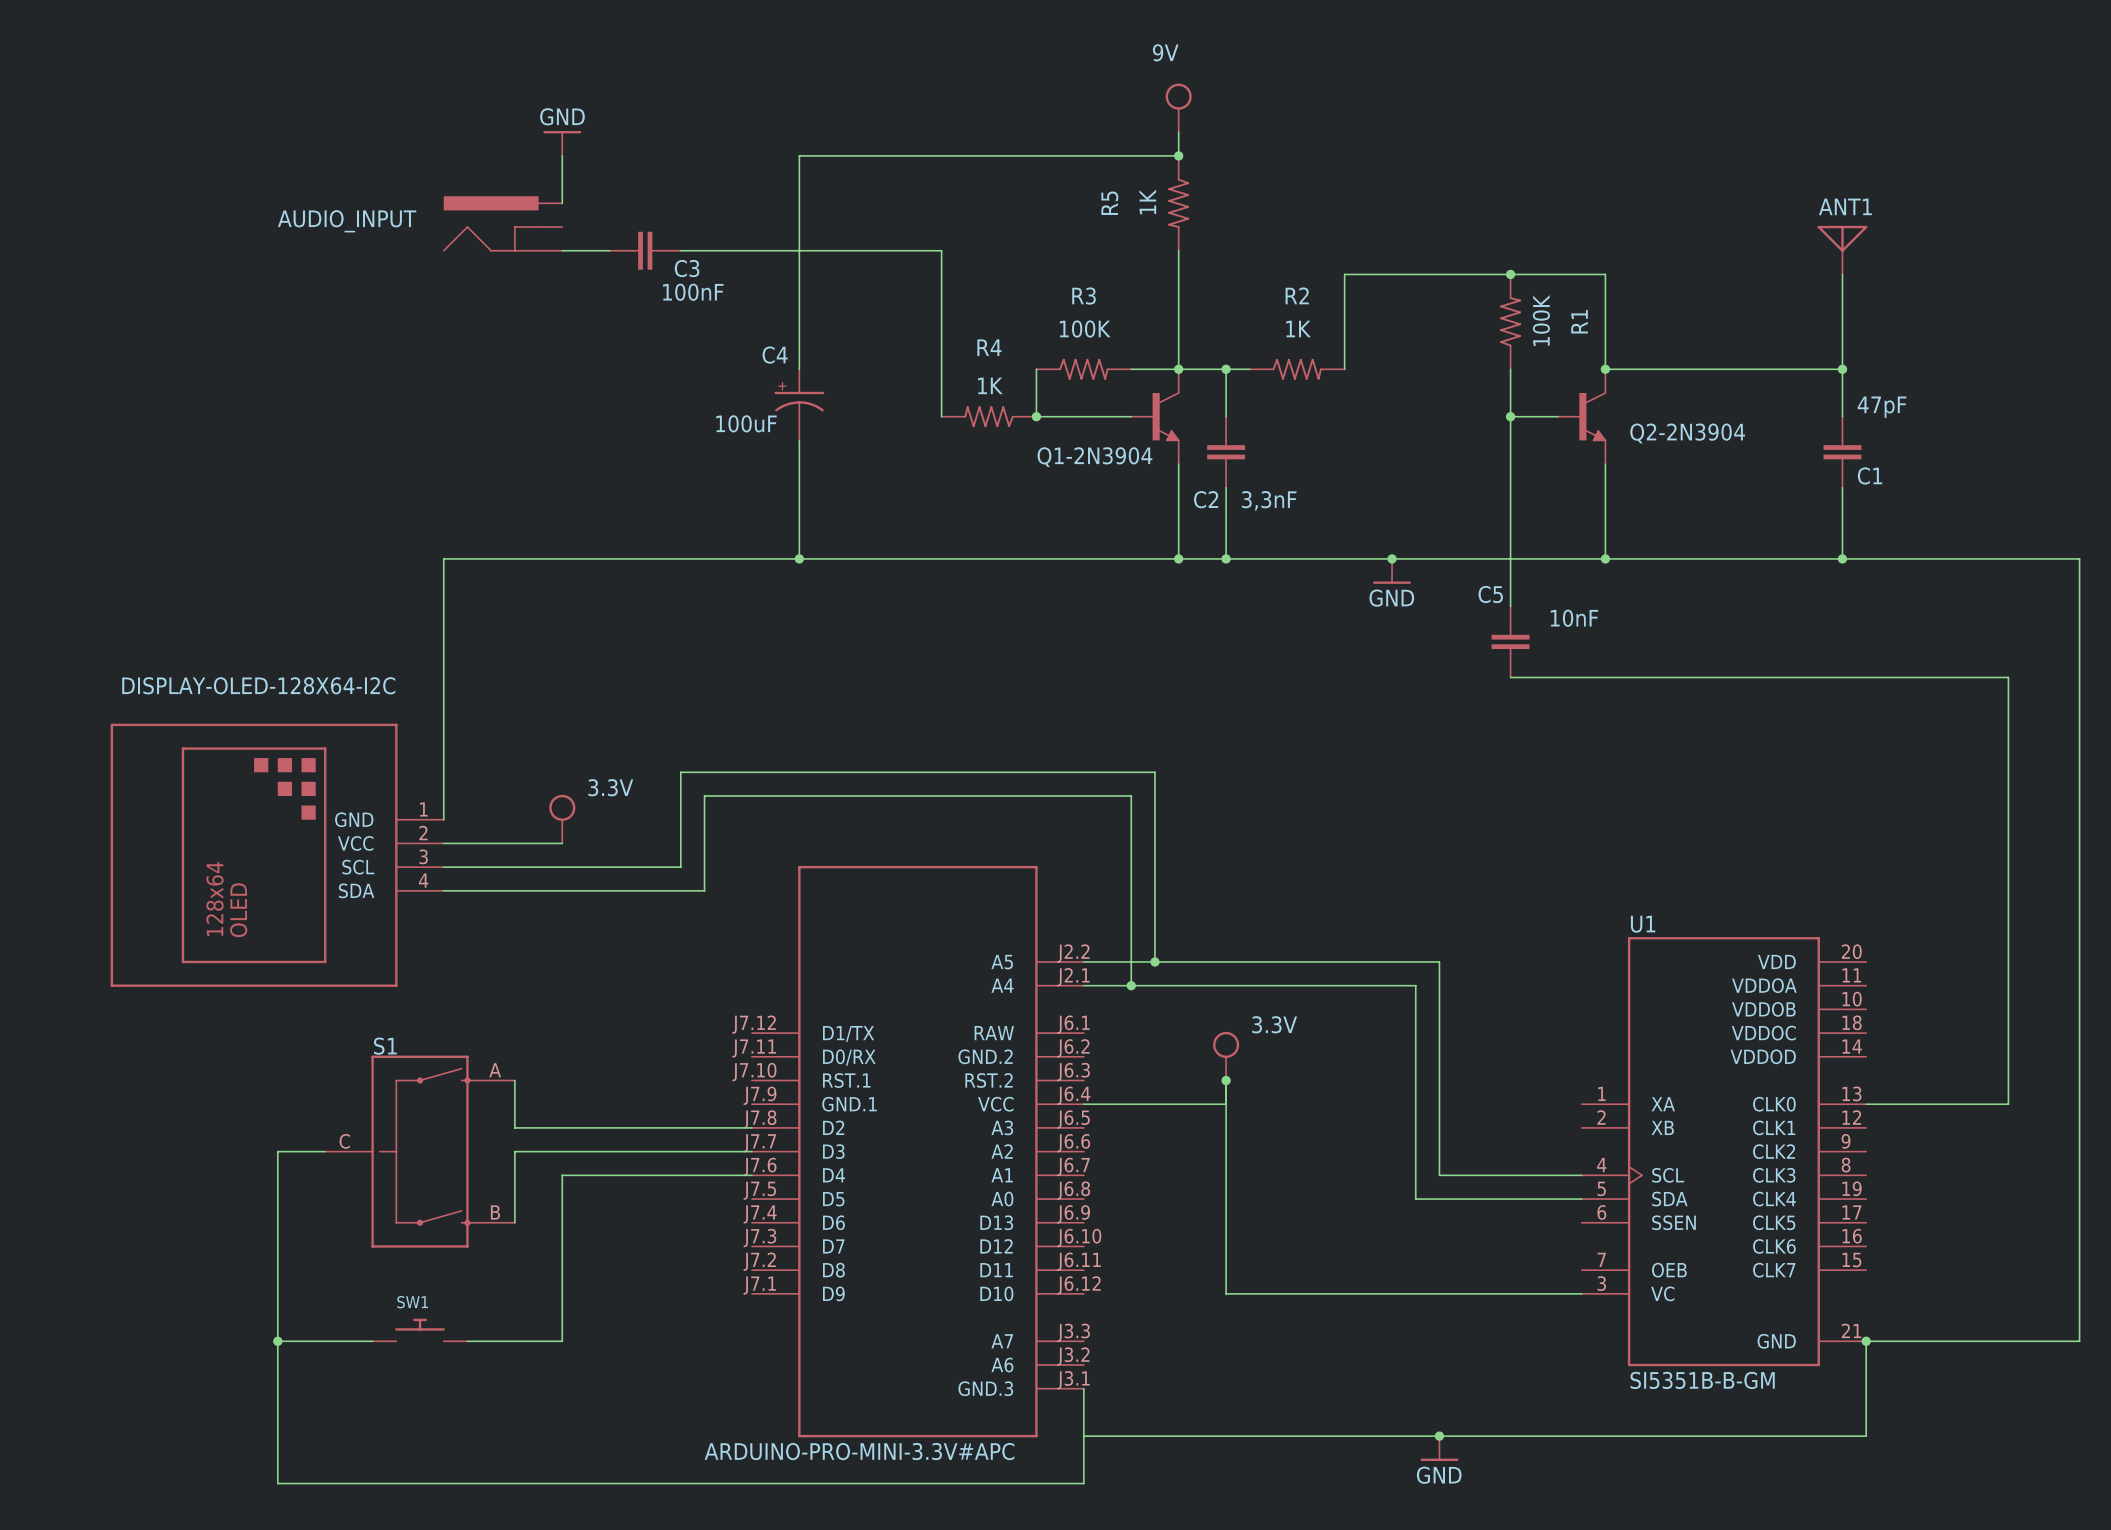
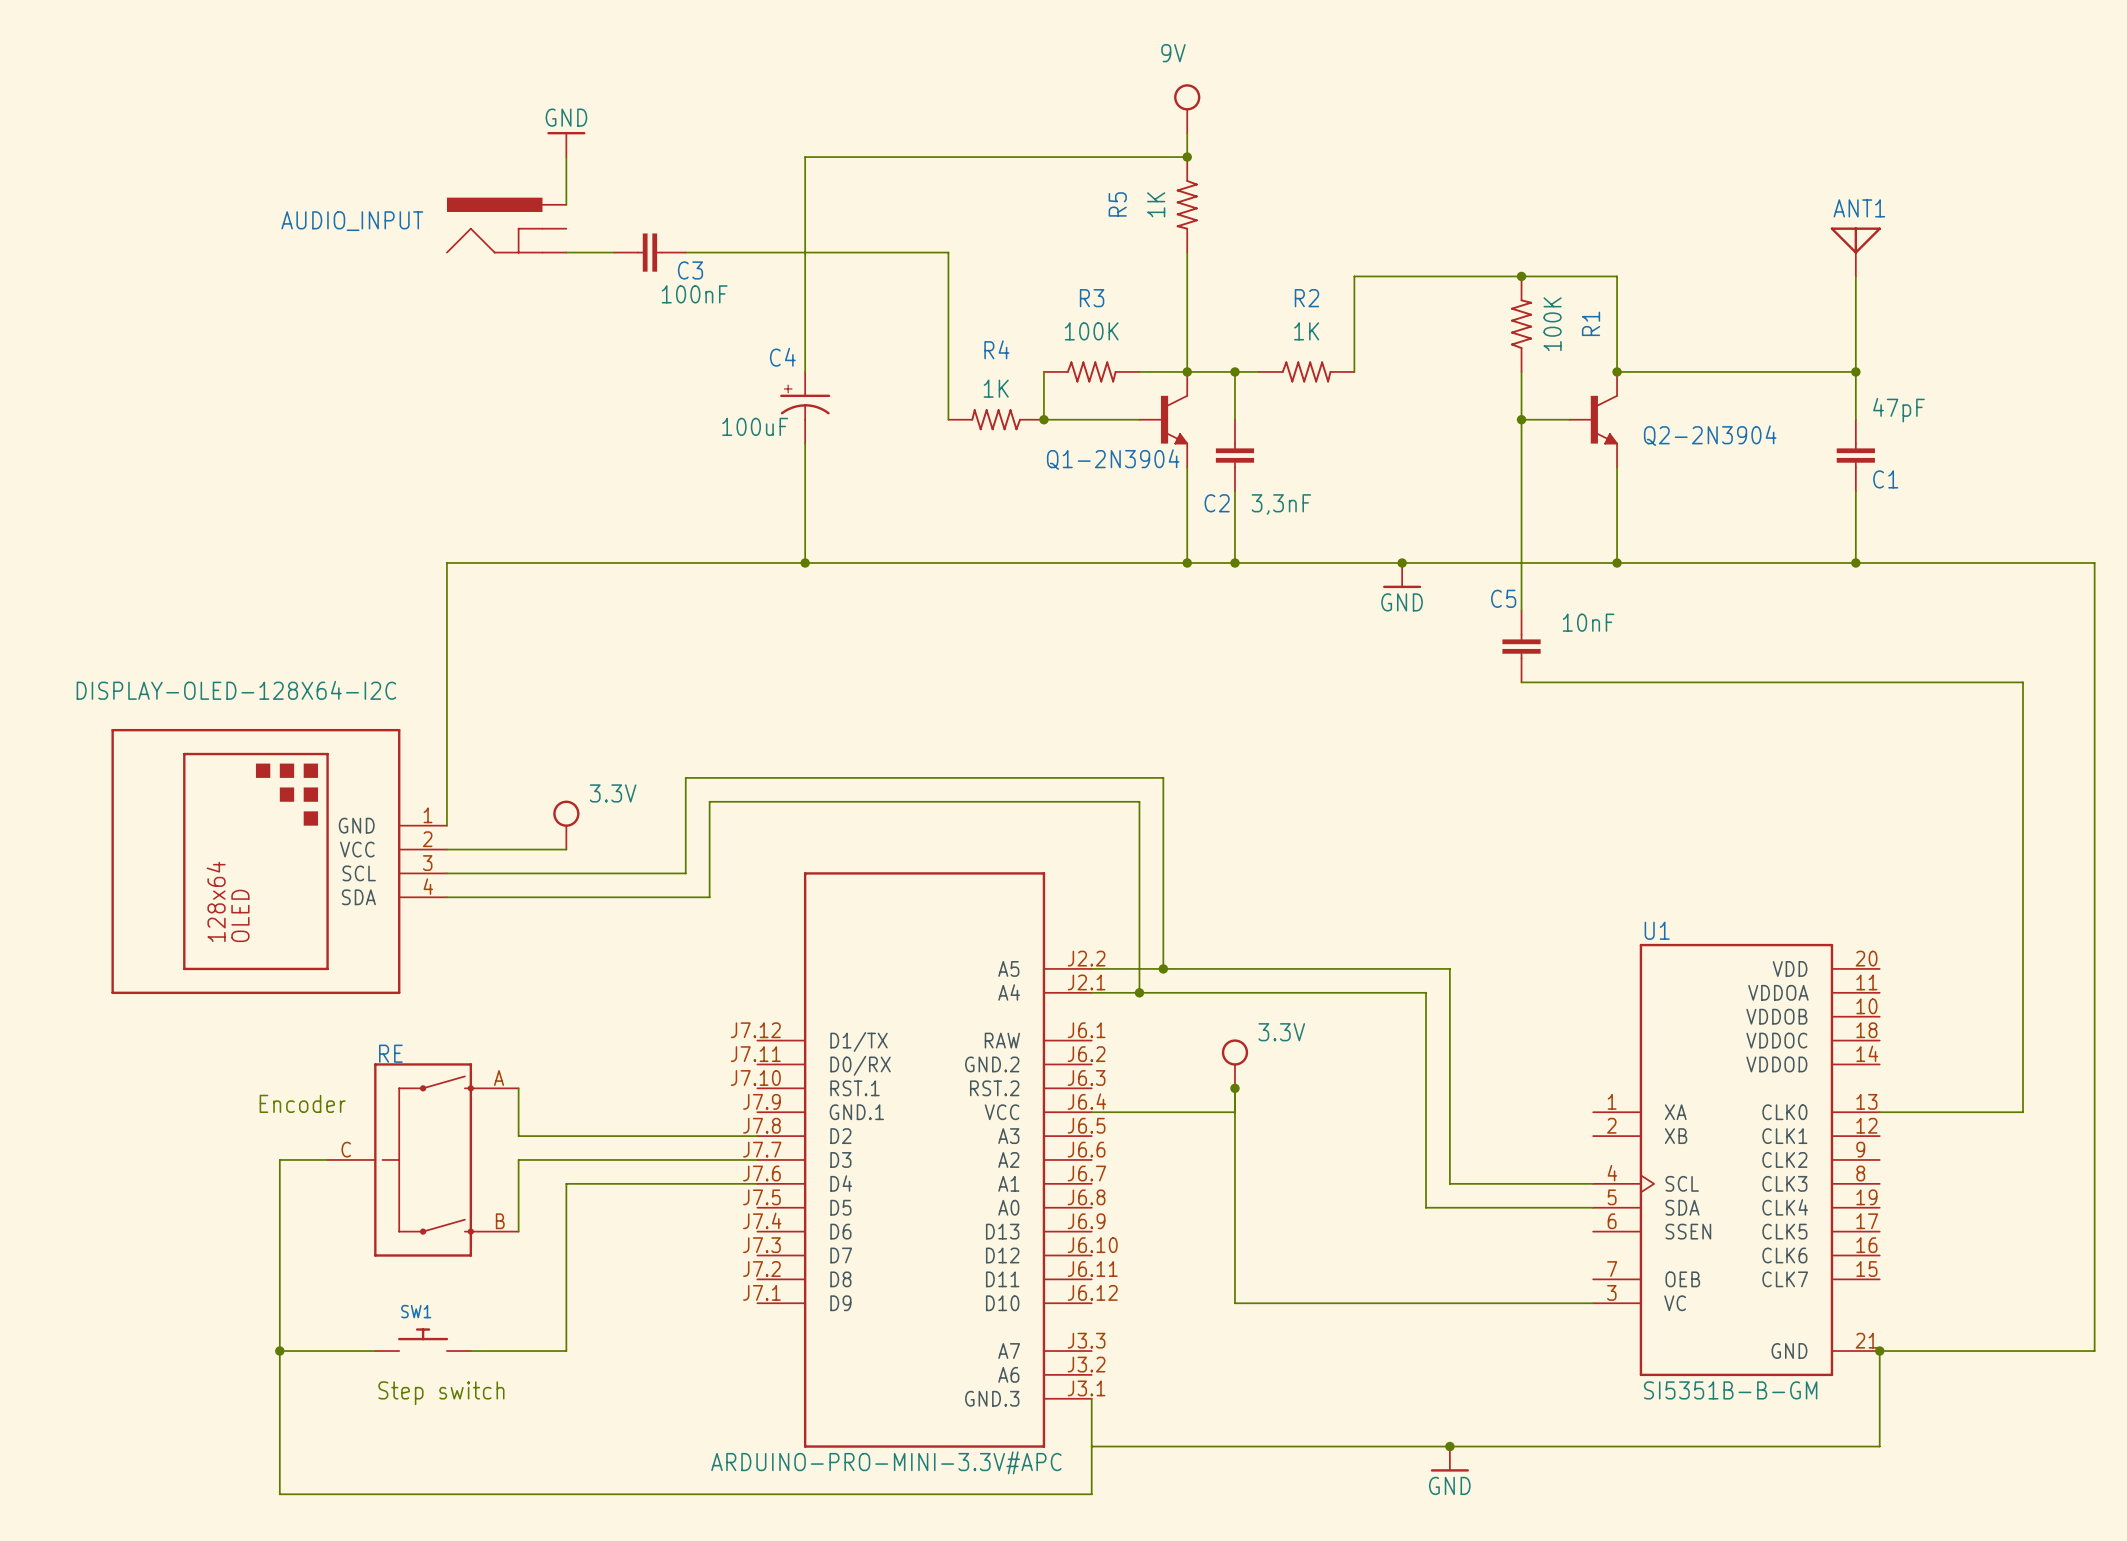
S1 name: S1 (385, 1046) -> RE (390, 1053)
text: none -> Encoder (302, 1103)
text: none -> Step switch (441, 1393)

